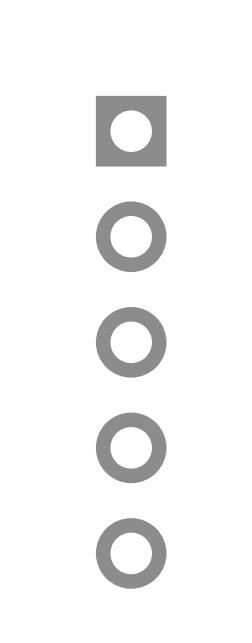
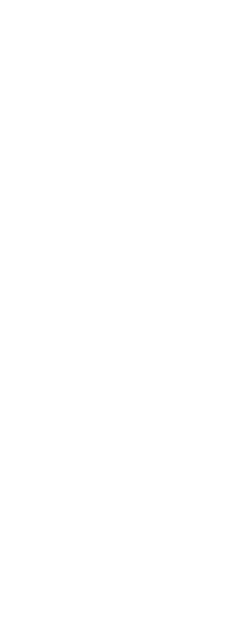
part: (131, 342) -> none

